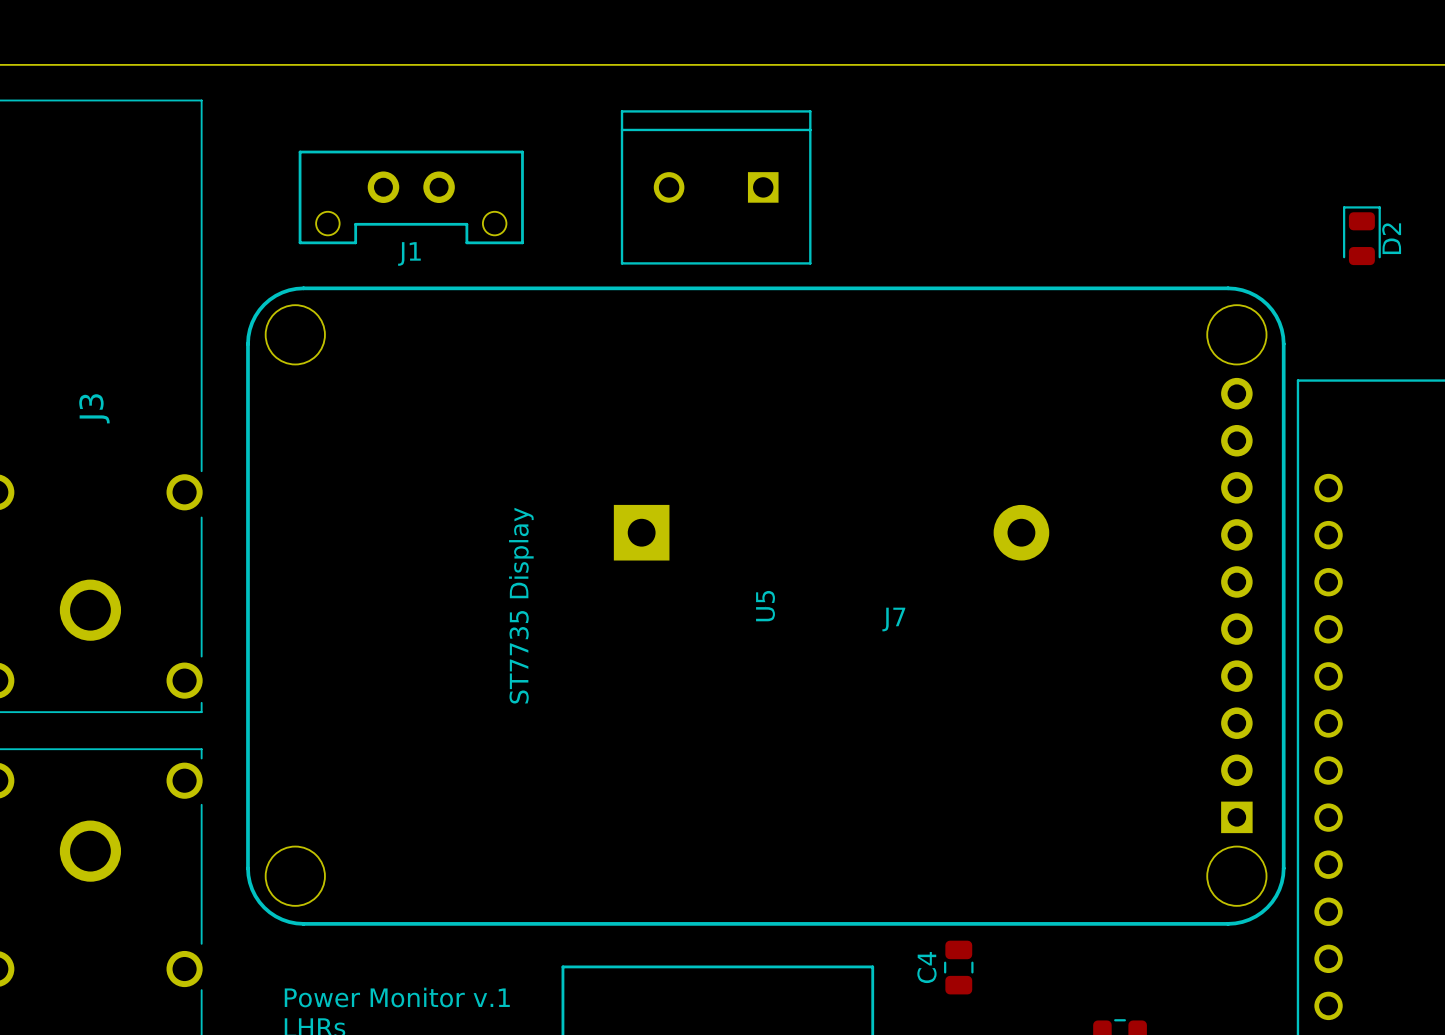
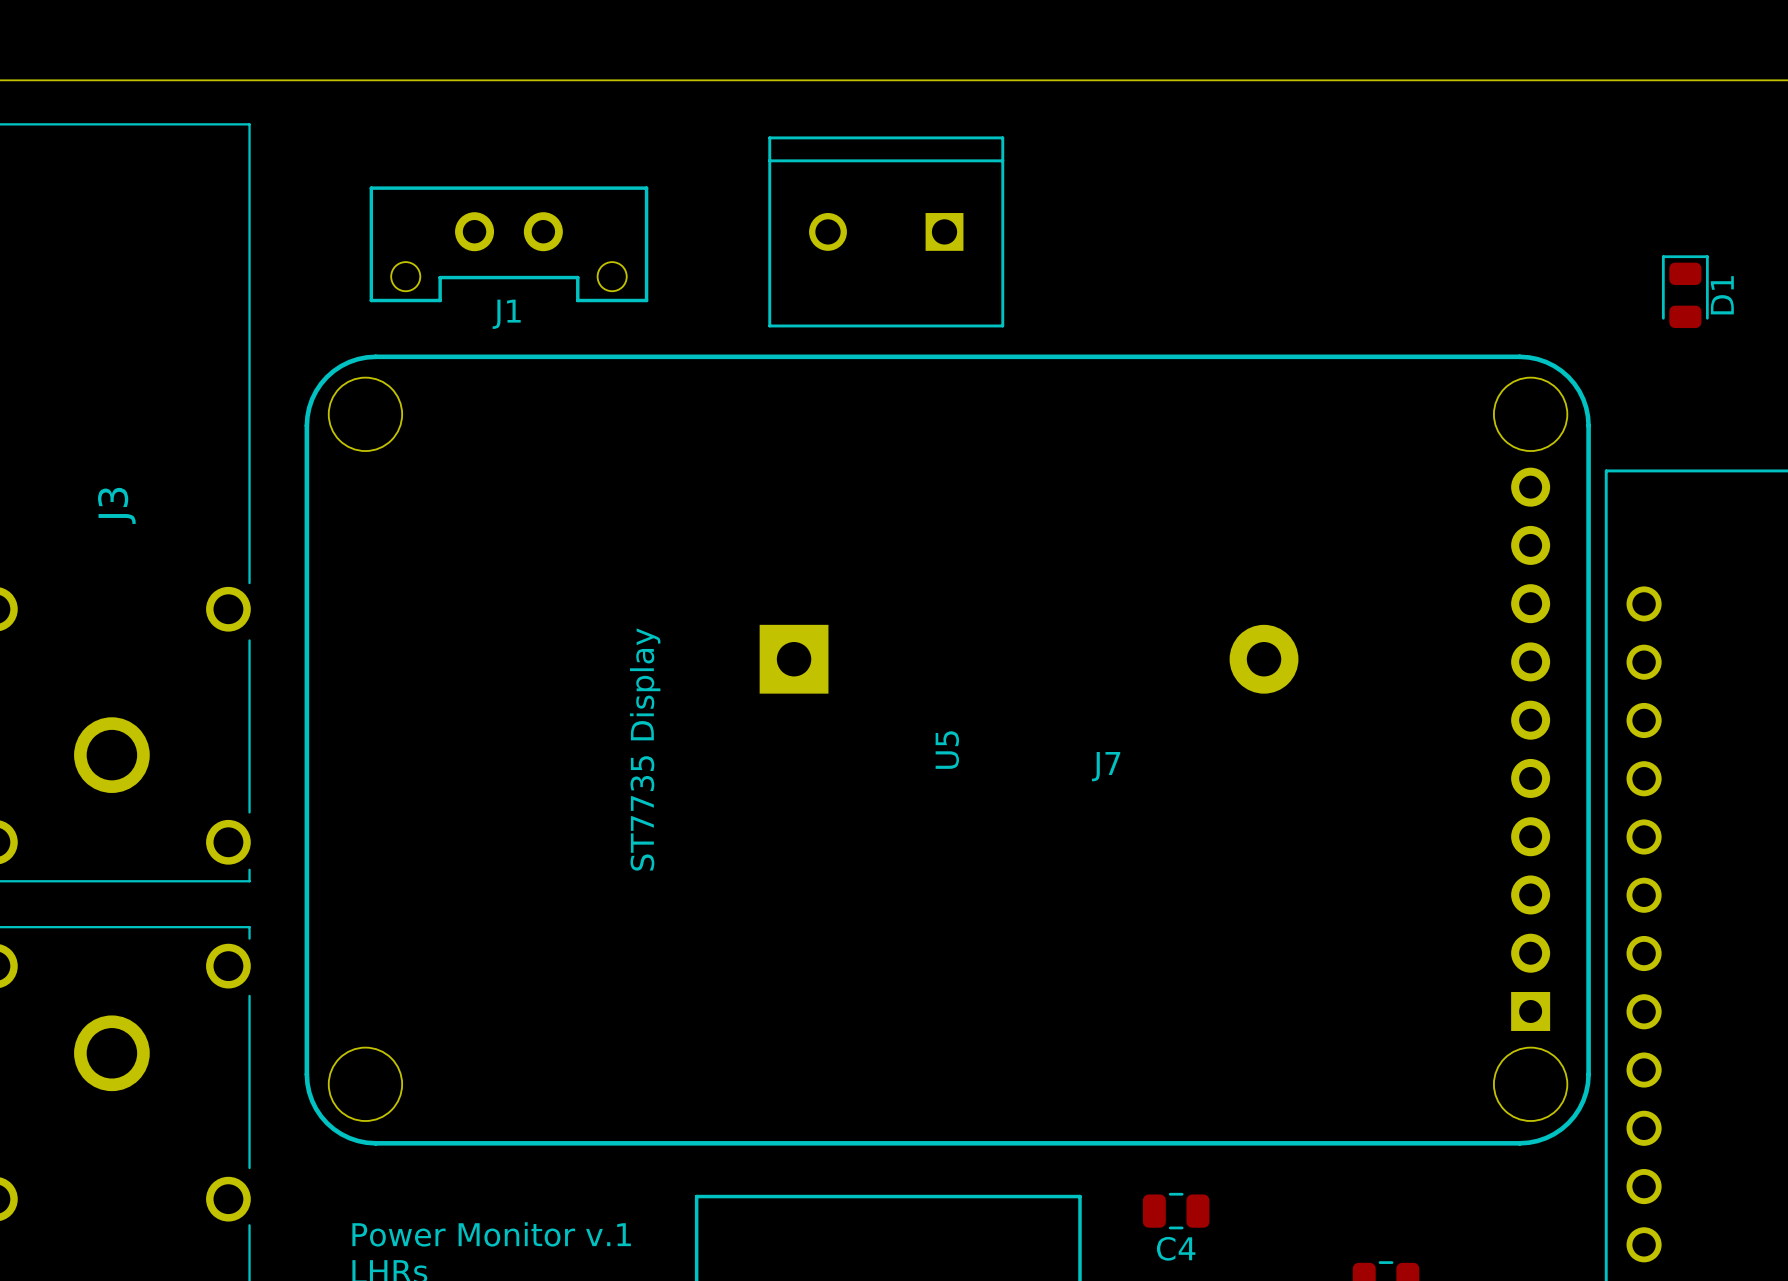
D2 name: D2 (1391, 238) -> D1 (1722, 295)
C4 name position: C4 (926, 967) -> C4 (1176, 1248)
C4 rotation: 0° (958, 967) -> 90° clockwise (1176, 1211)

